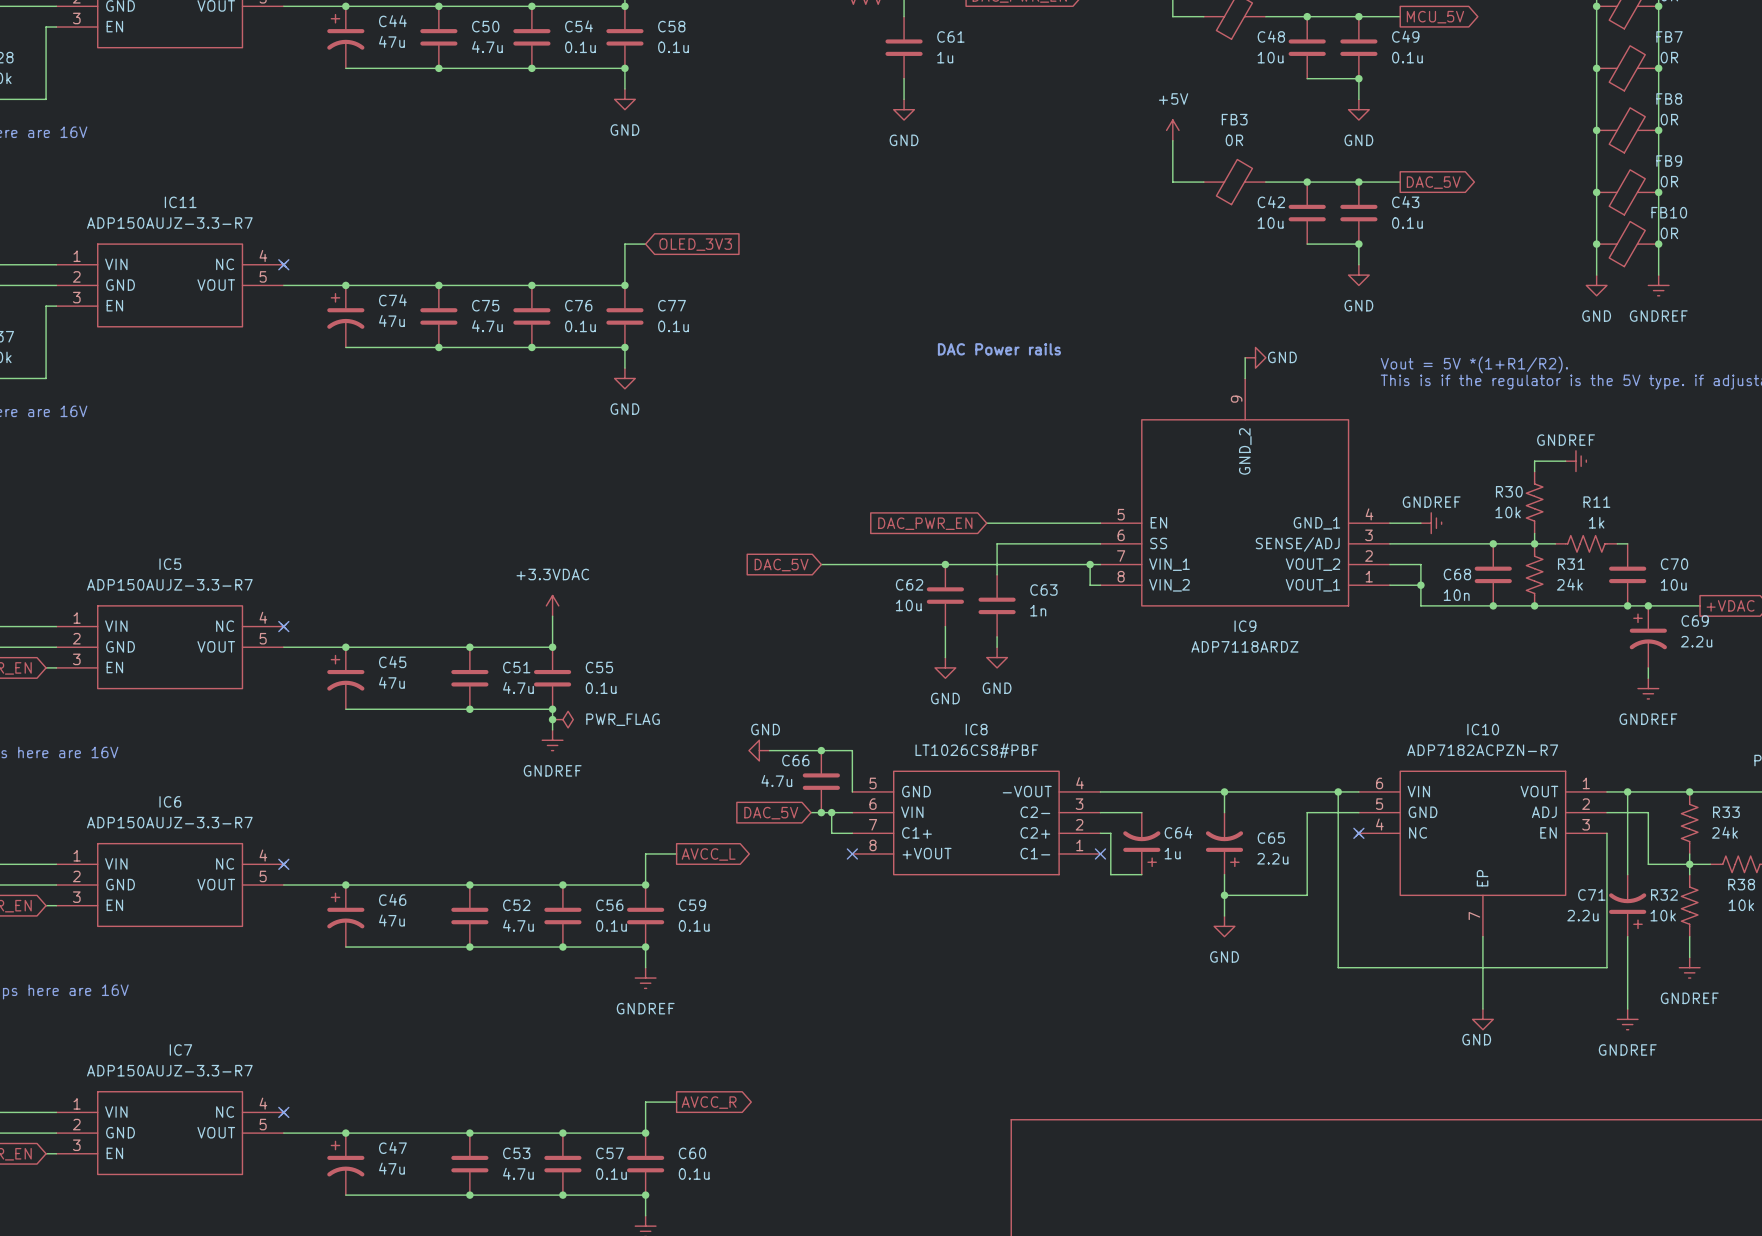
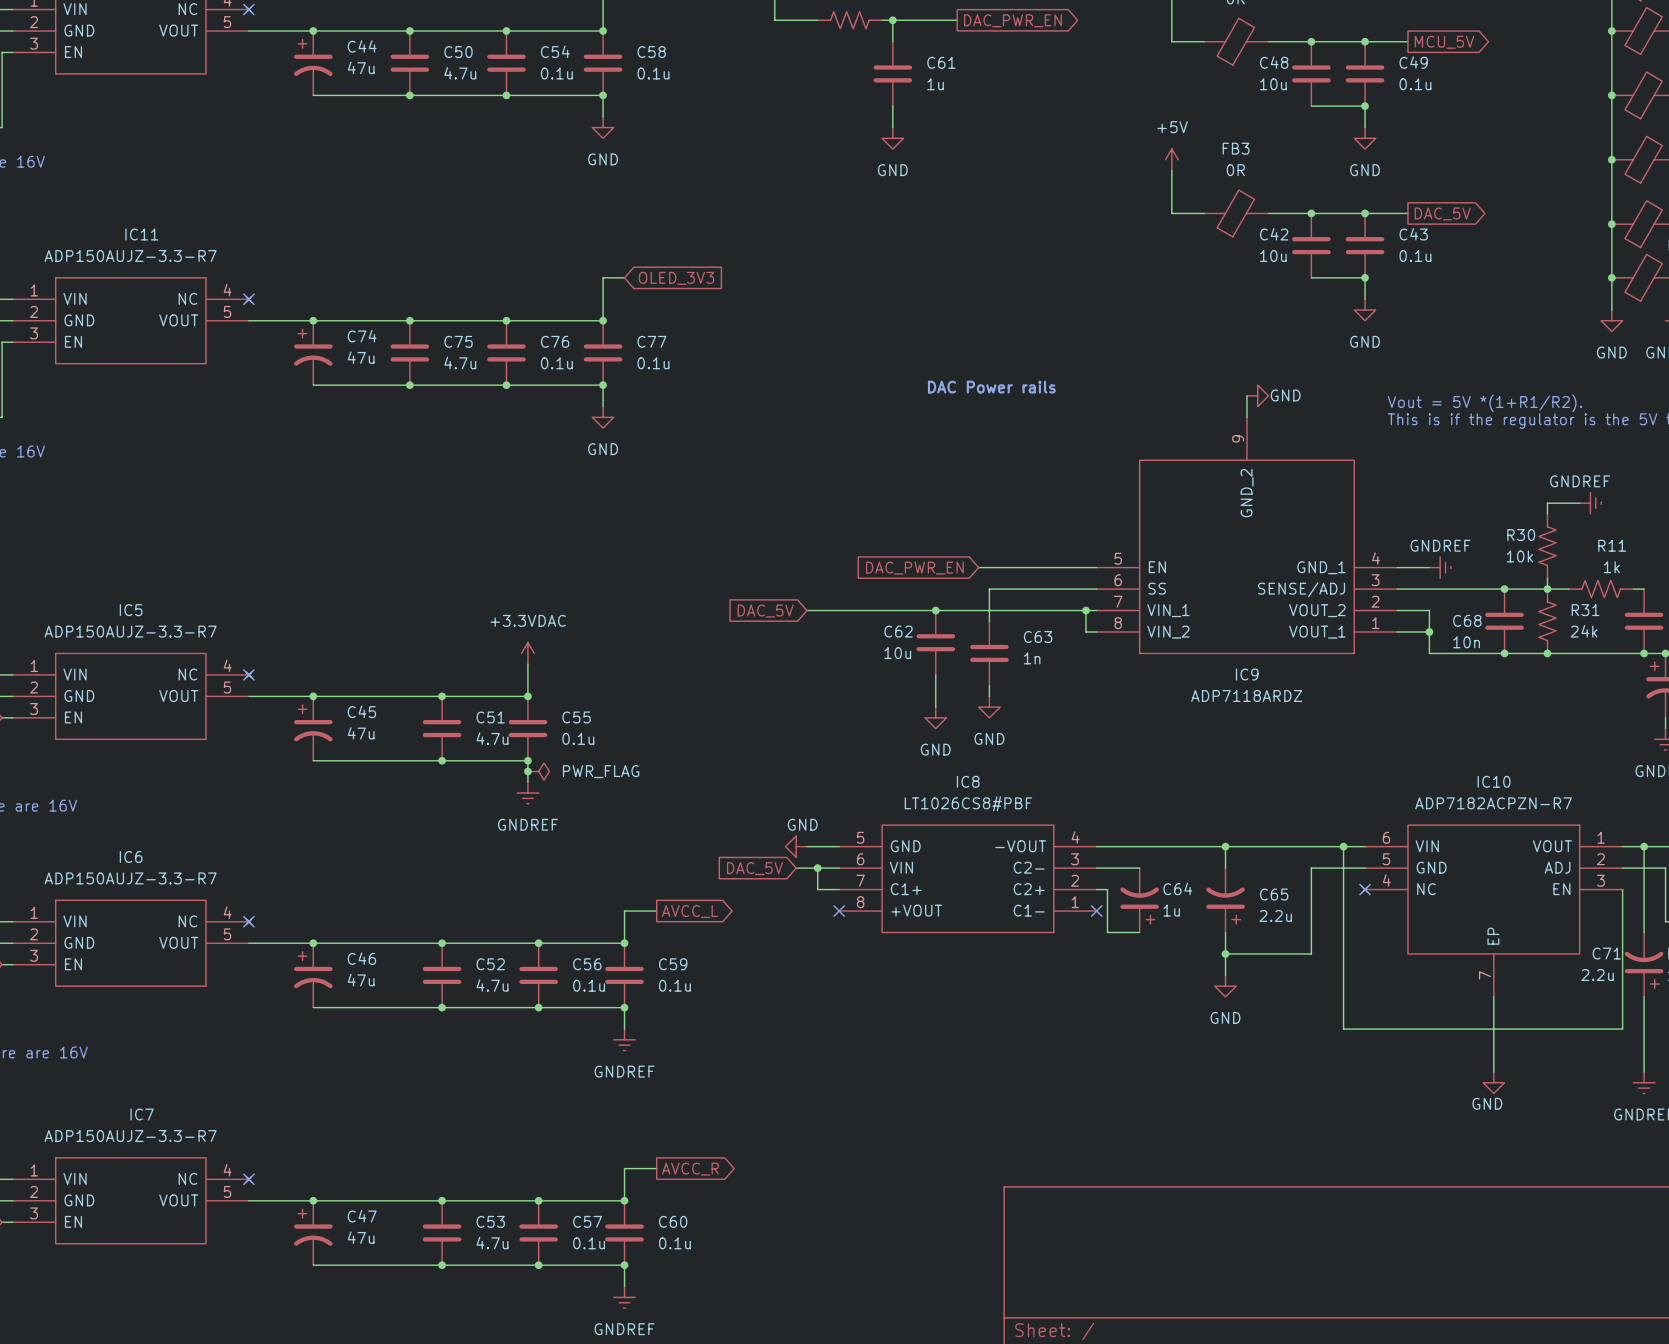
power symbol position: GND (759, 750) -> GND (796, 846)
wire: (769, 750) (852, 750) (852, 791) -> (806, 846) (839, 846)
junction: (821, 750) -> none
C66: 4.7u (821, 781) -> none
junction: (821, 812) -> none

